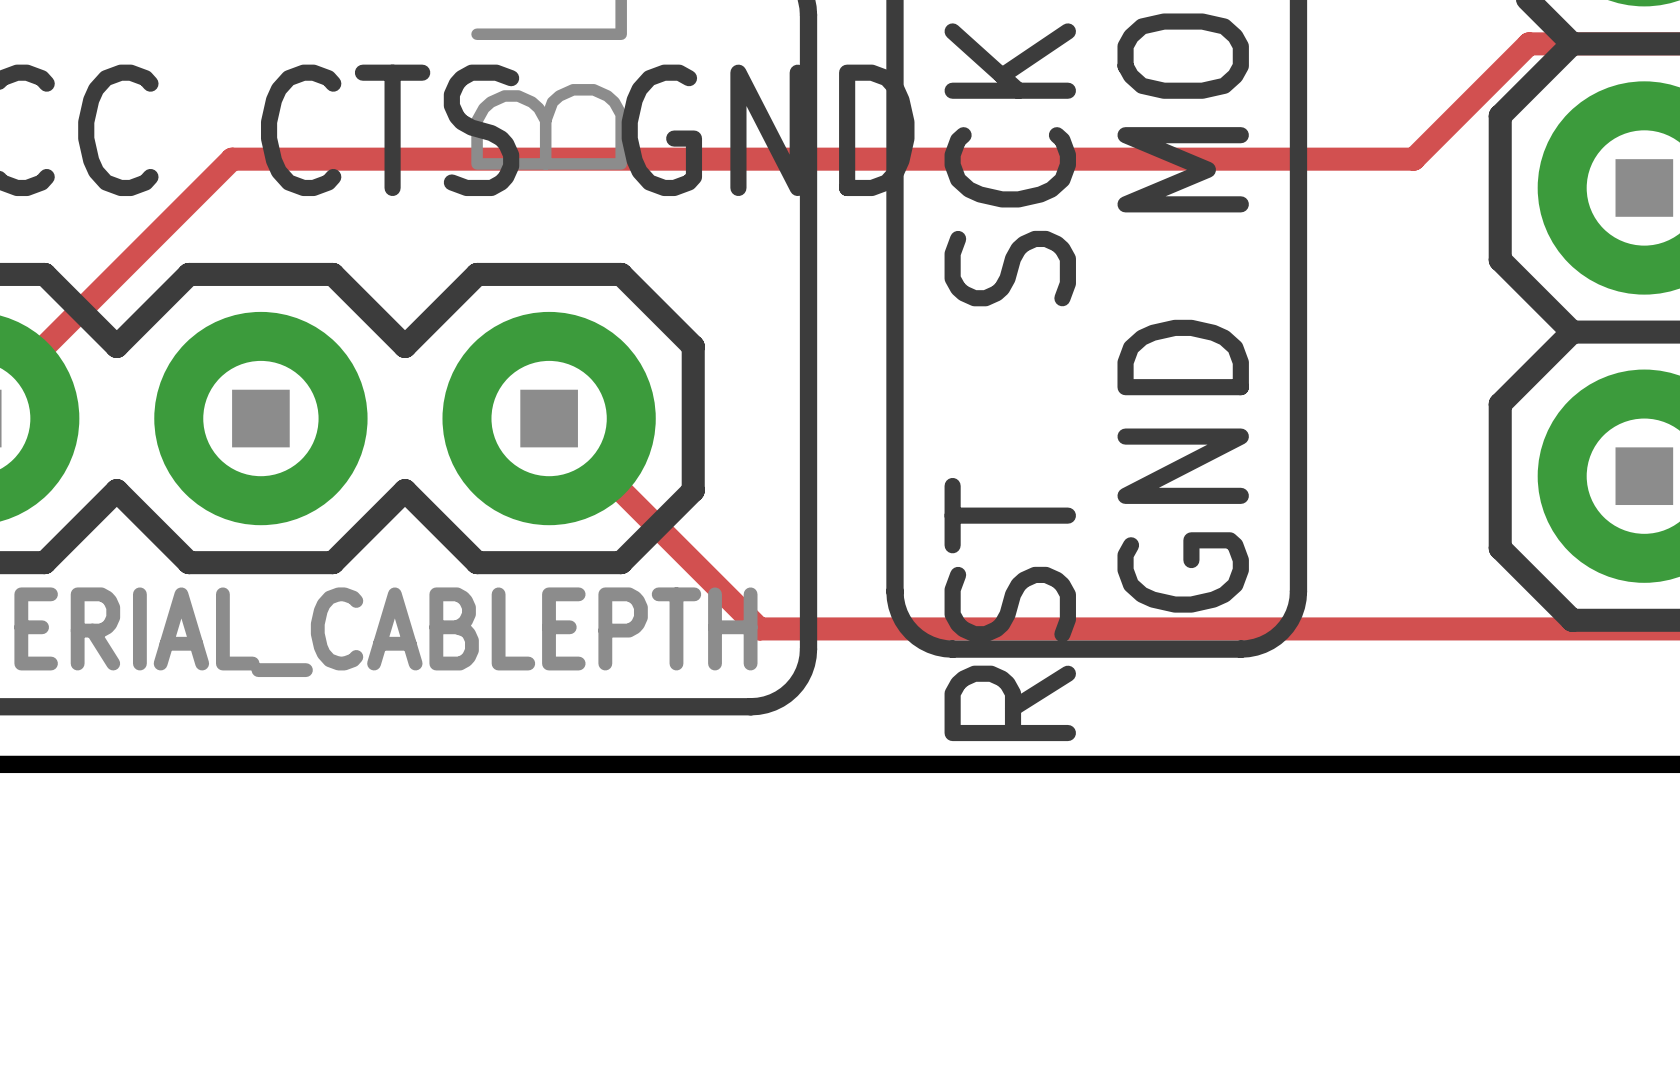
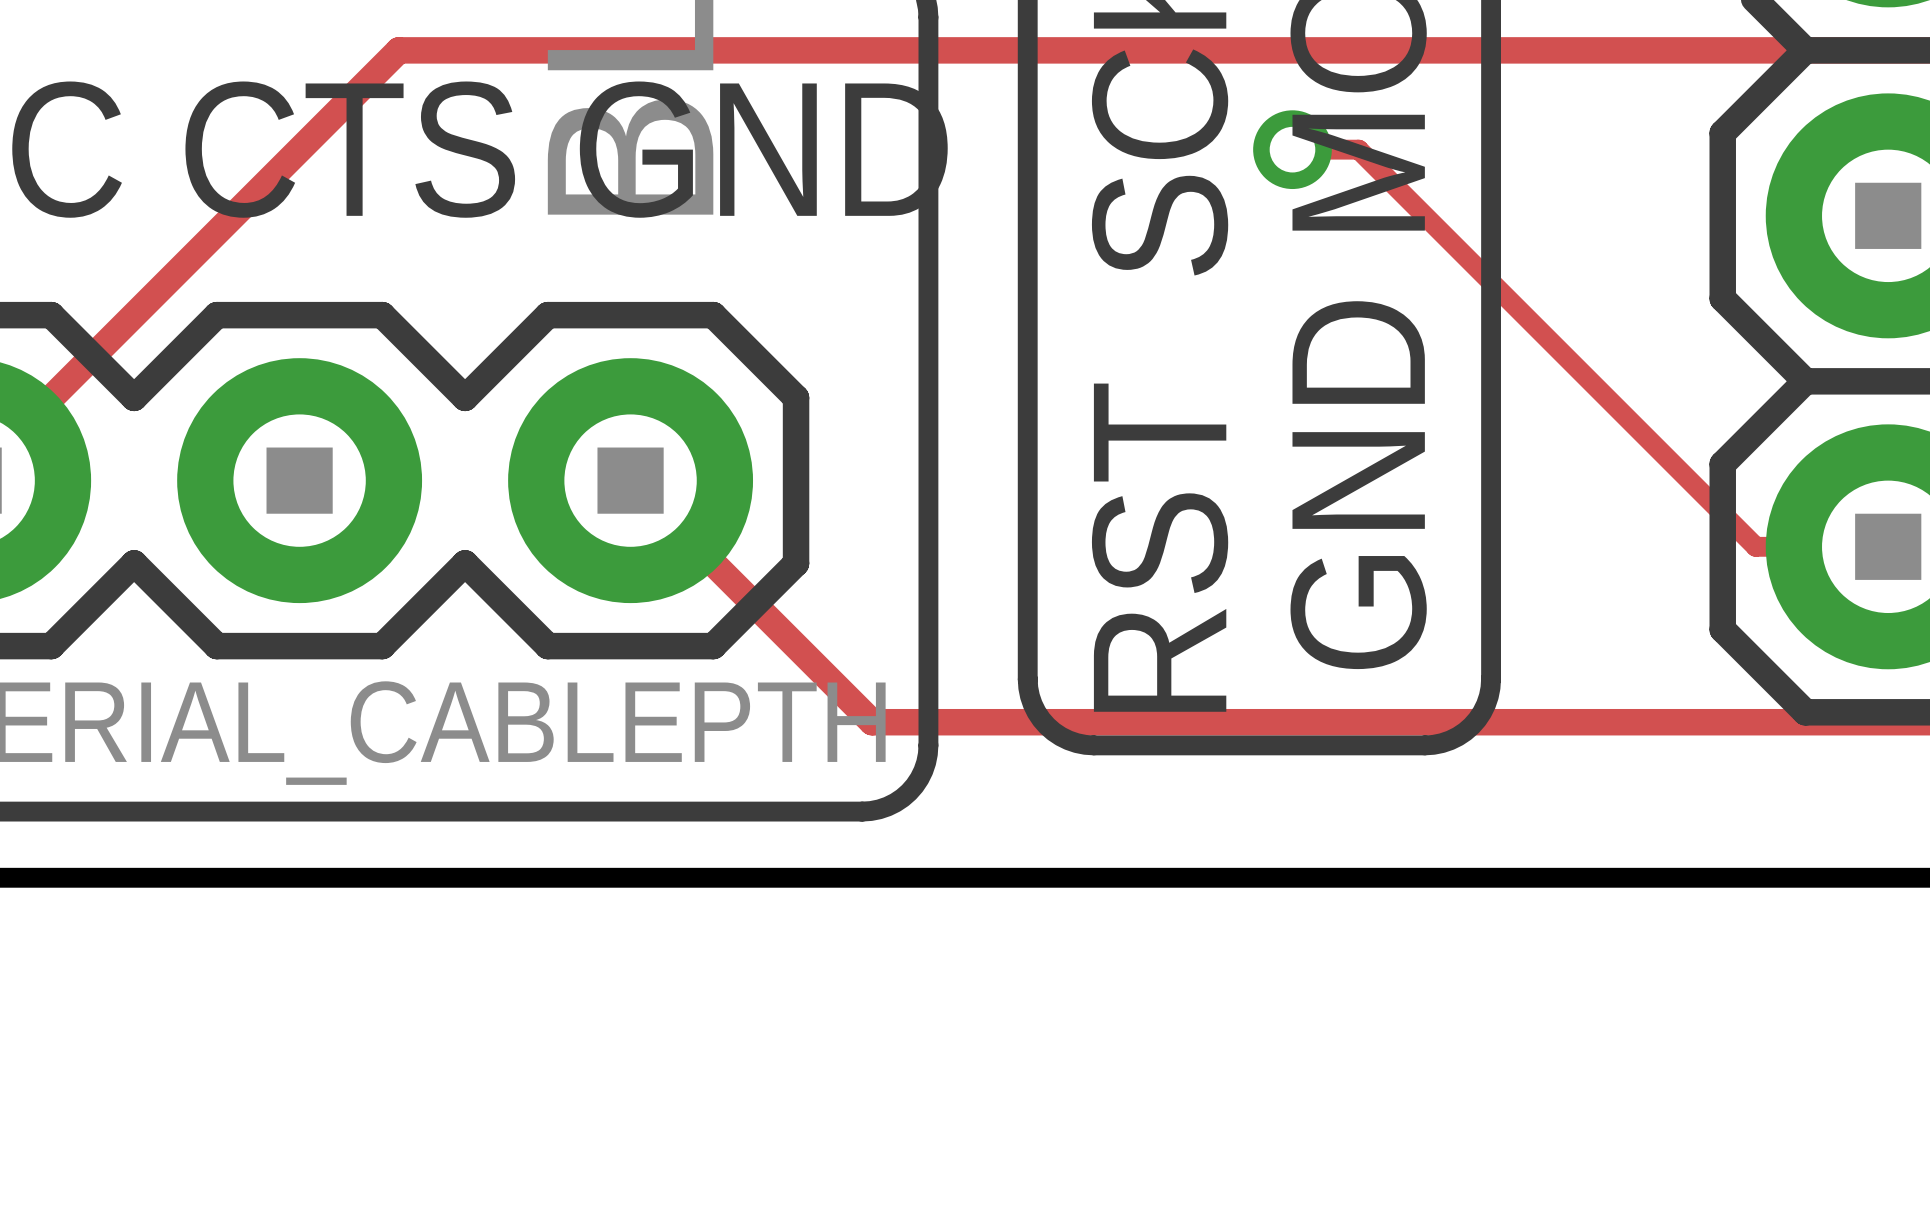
track: (1529, 43) (1413, 159) (232, 159) -> (1755, 50) (398, 50) (266, 182)
track: none -> (1292, 149) (1358, 149) (1755, 546) (1888, 546)
via: none -> (1292, 149)

